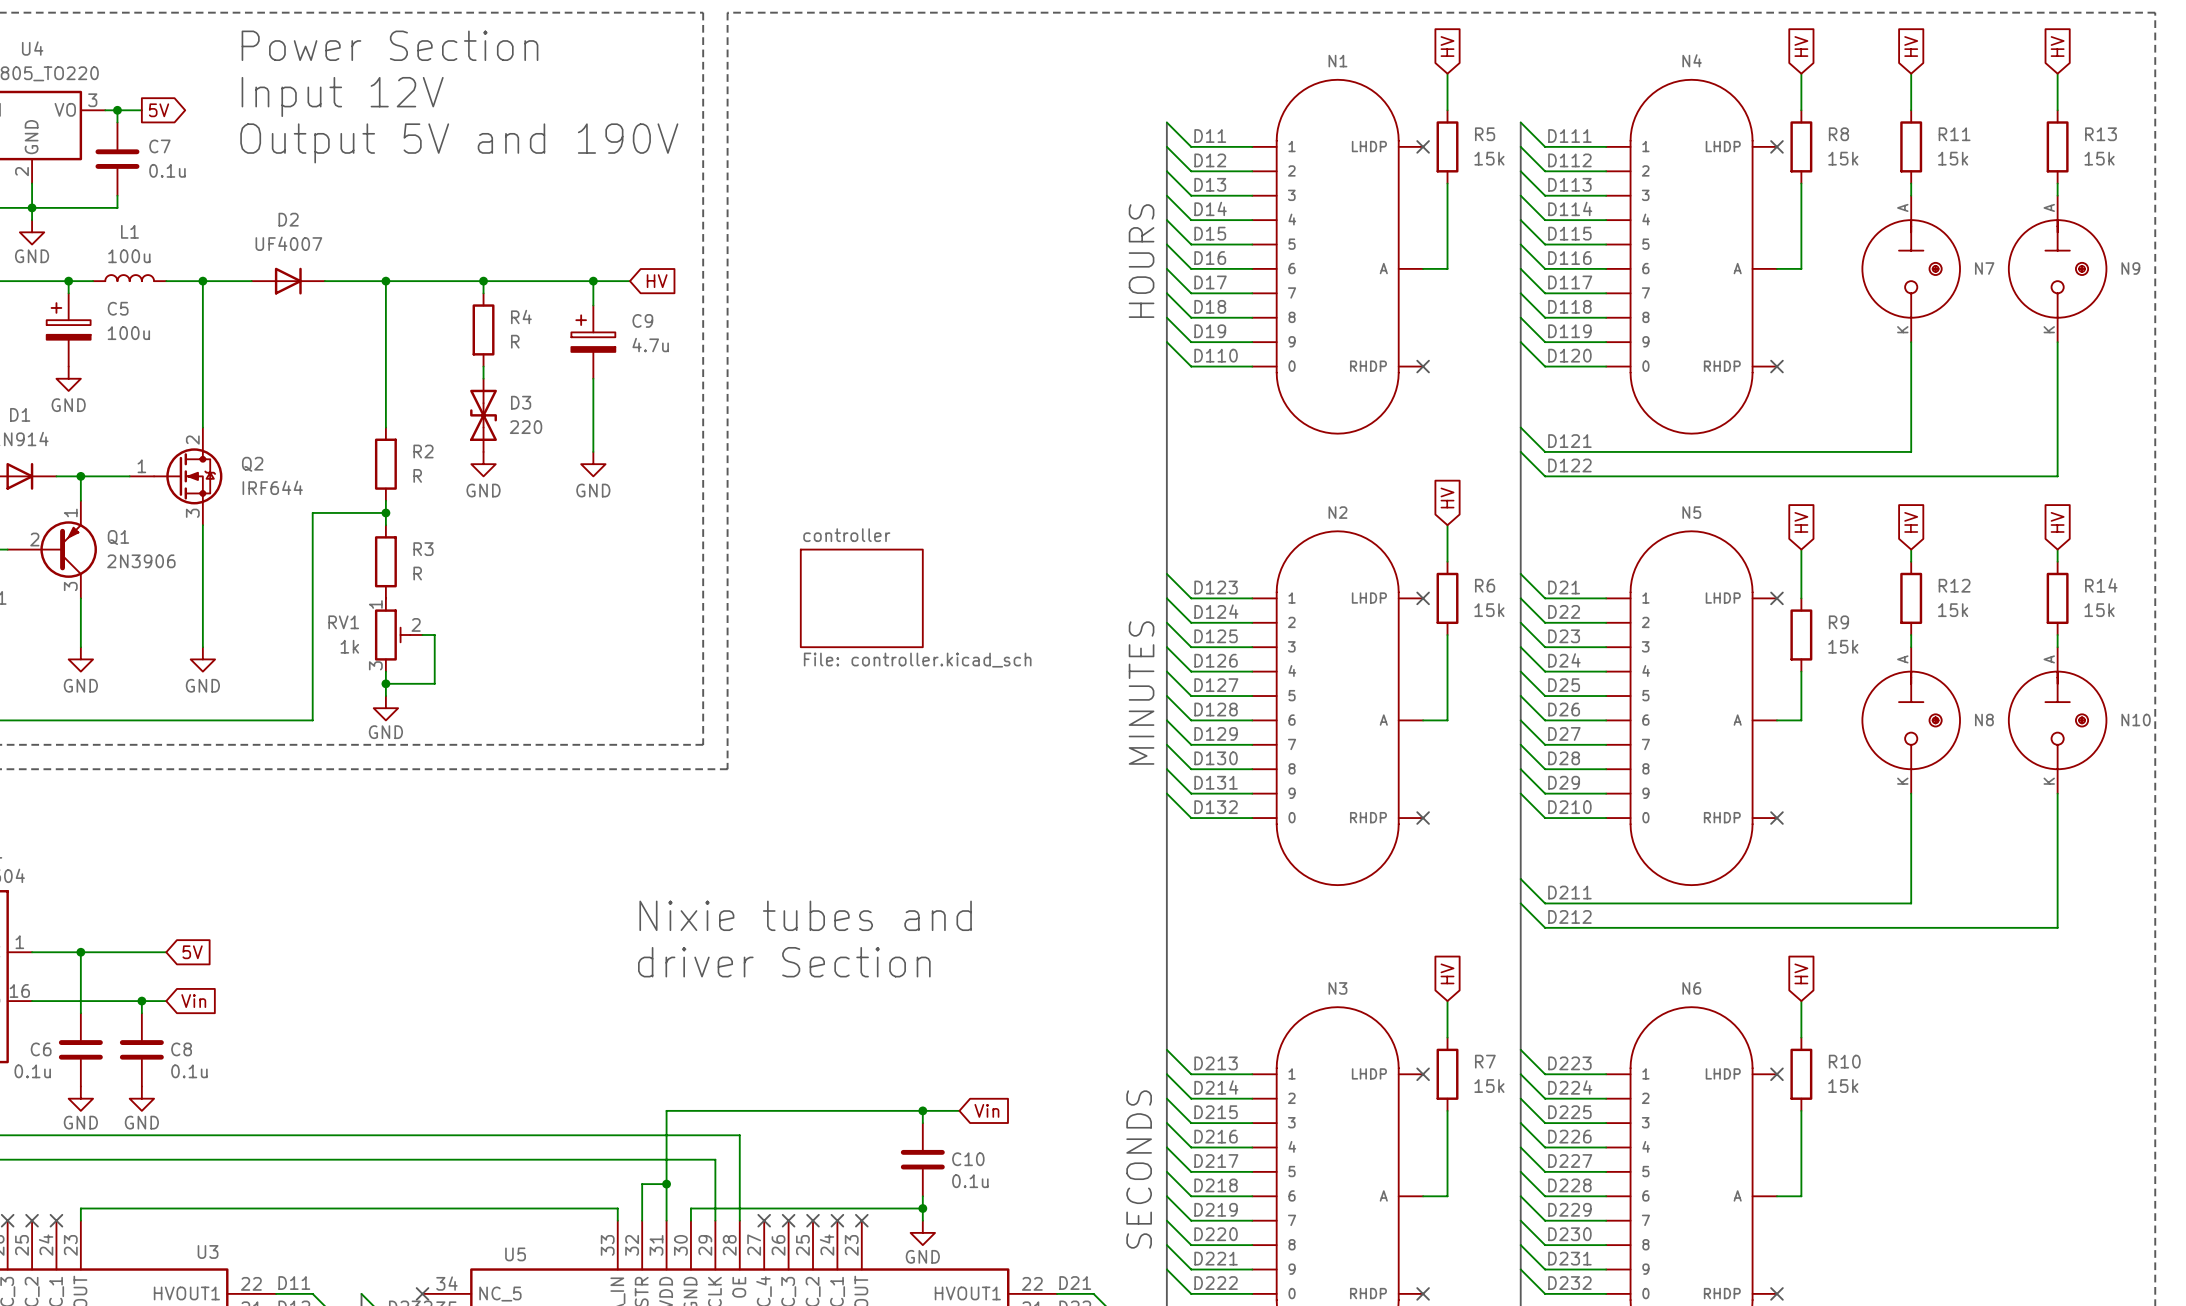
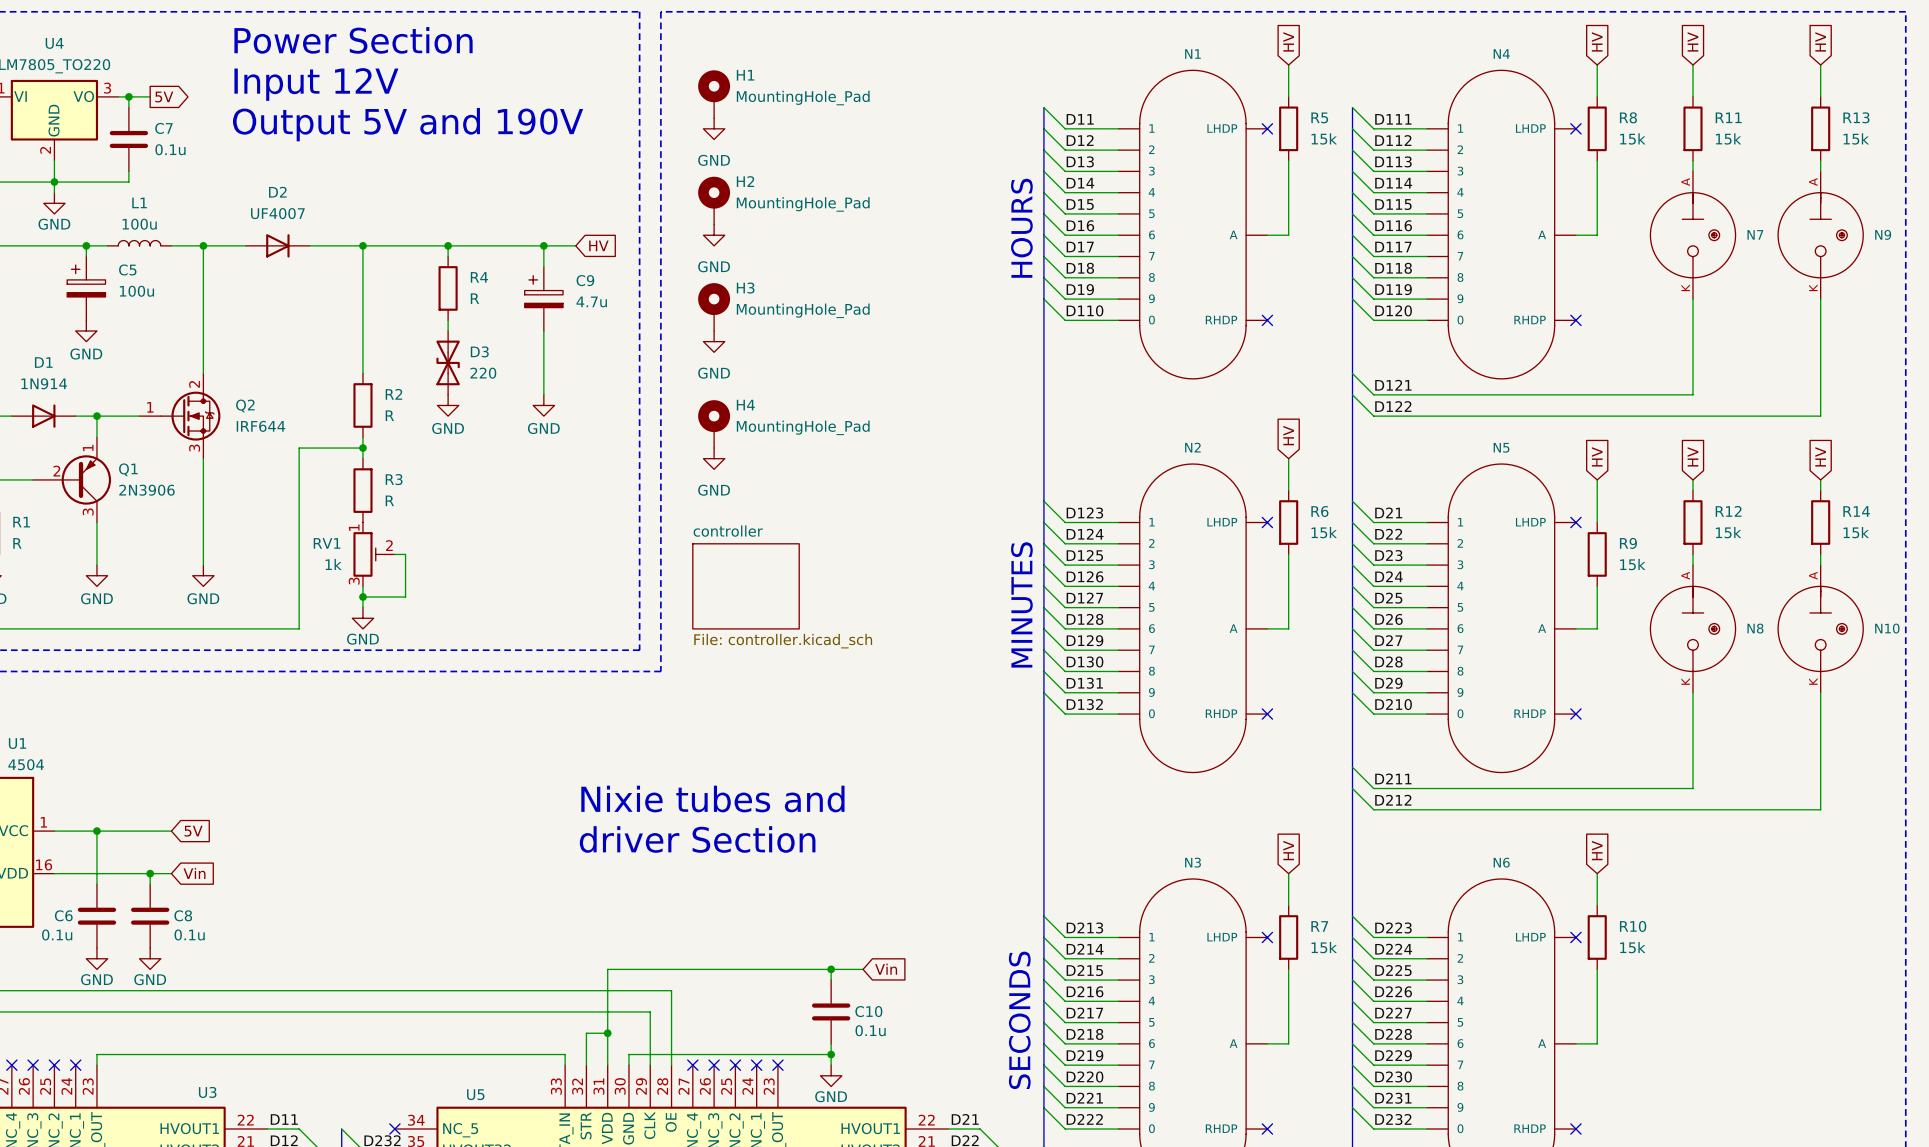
H1: none -> MountingHole_Pad (714, 94)
power symbol: none -> GND (714, 128)
H2: none -> MountingHole_Pad (714, 200)
power symbol: none -> GND (714, 235)
H3: none -> MountingHole_Pad (714, 307)
power symbol: none -> GND (714, 341)
H4: none -> MountingHole_Pad (714, 424)
power symbol: none -> GND (714, 458)
sheet controller position: (861, 598) -> (746, 586)

